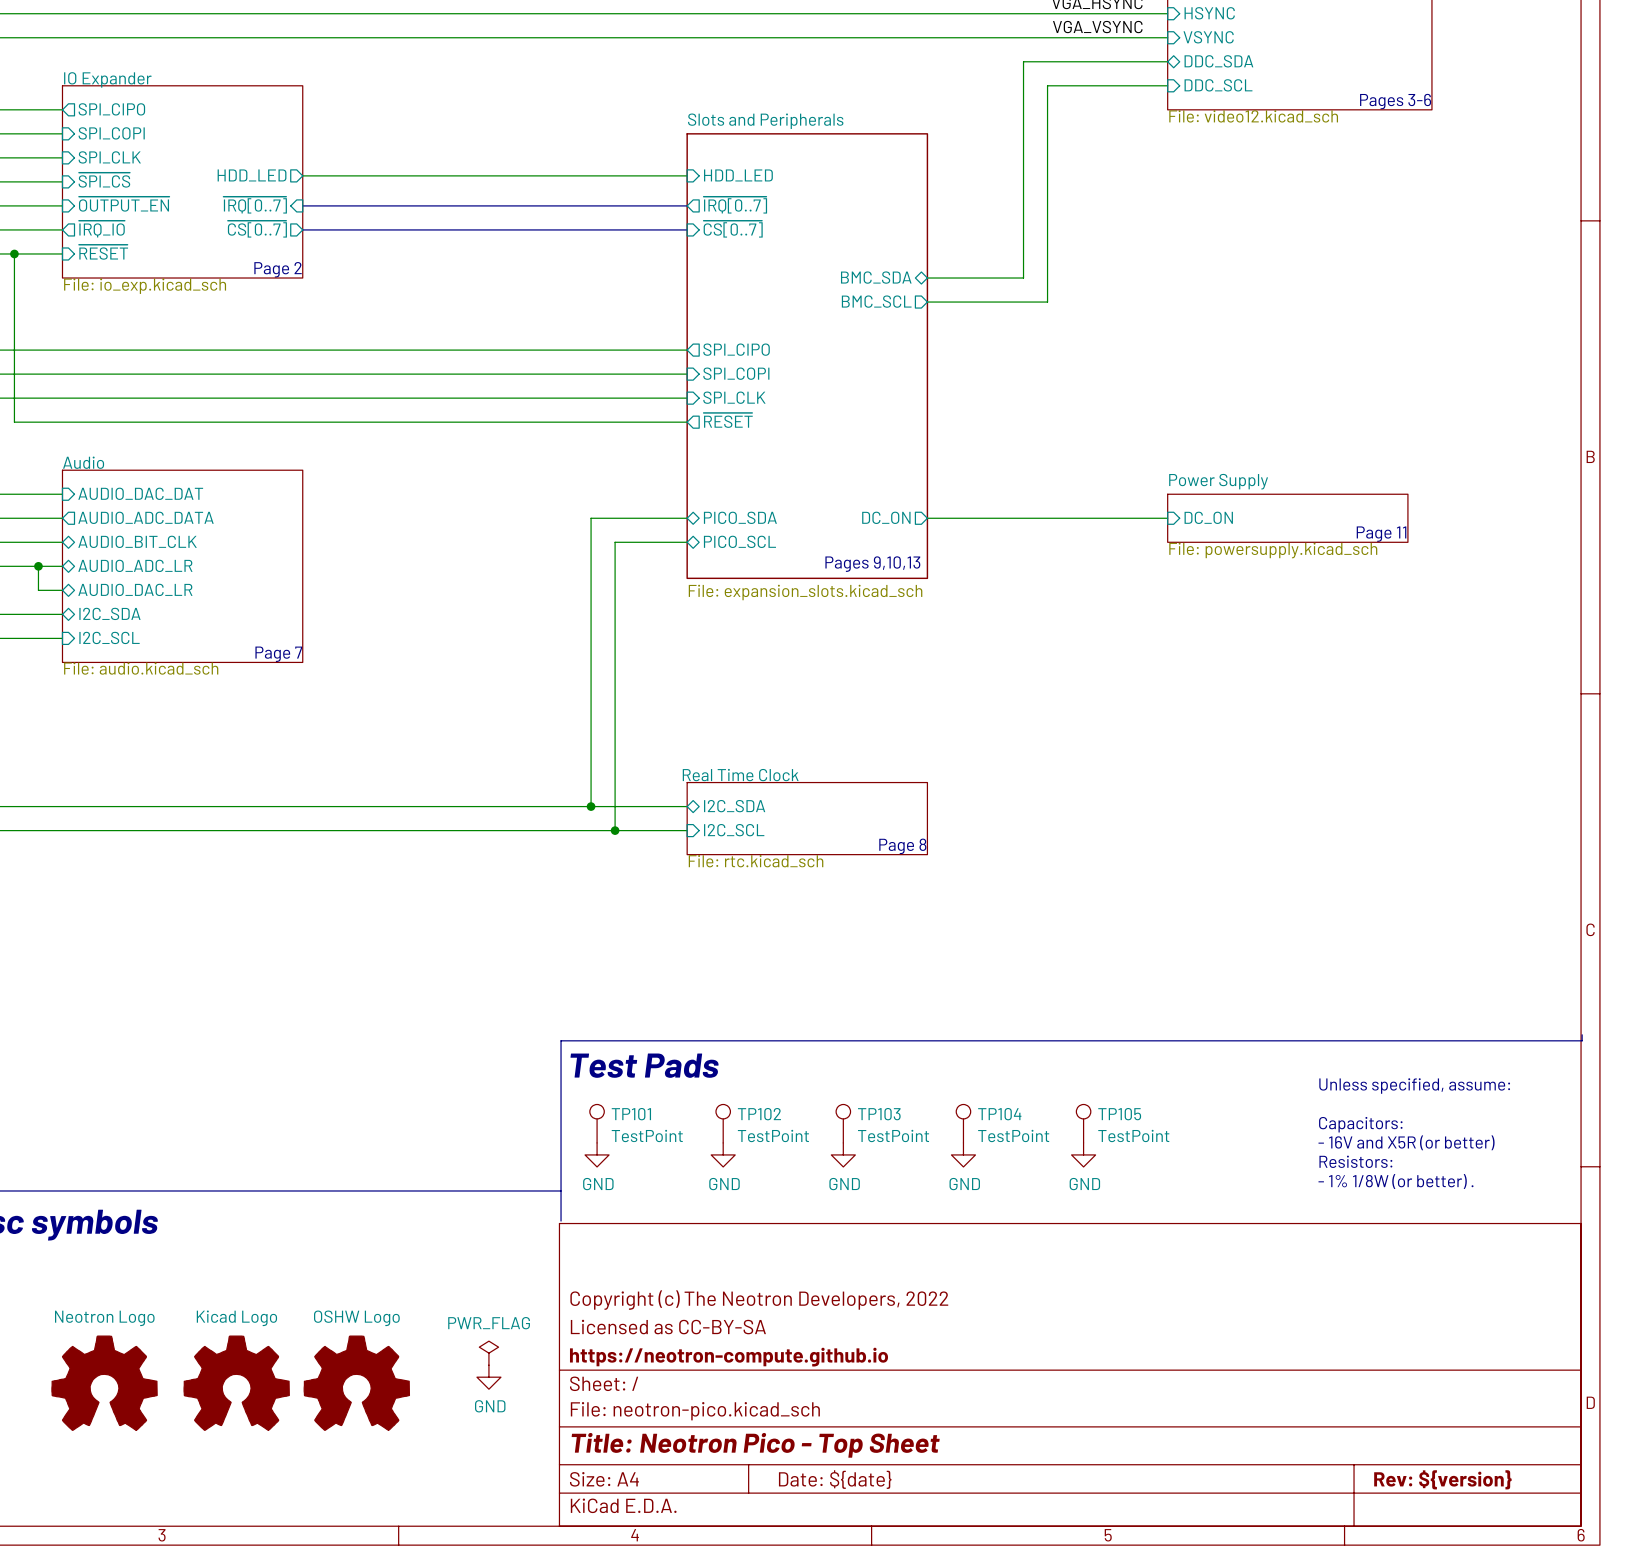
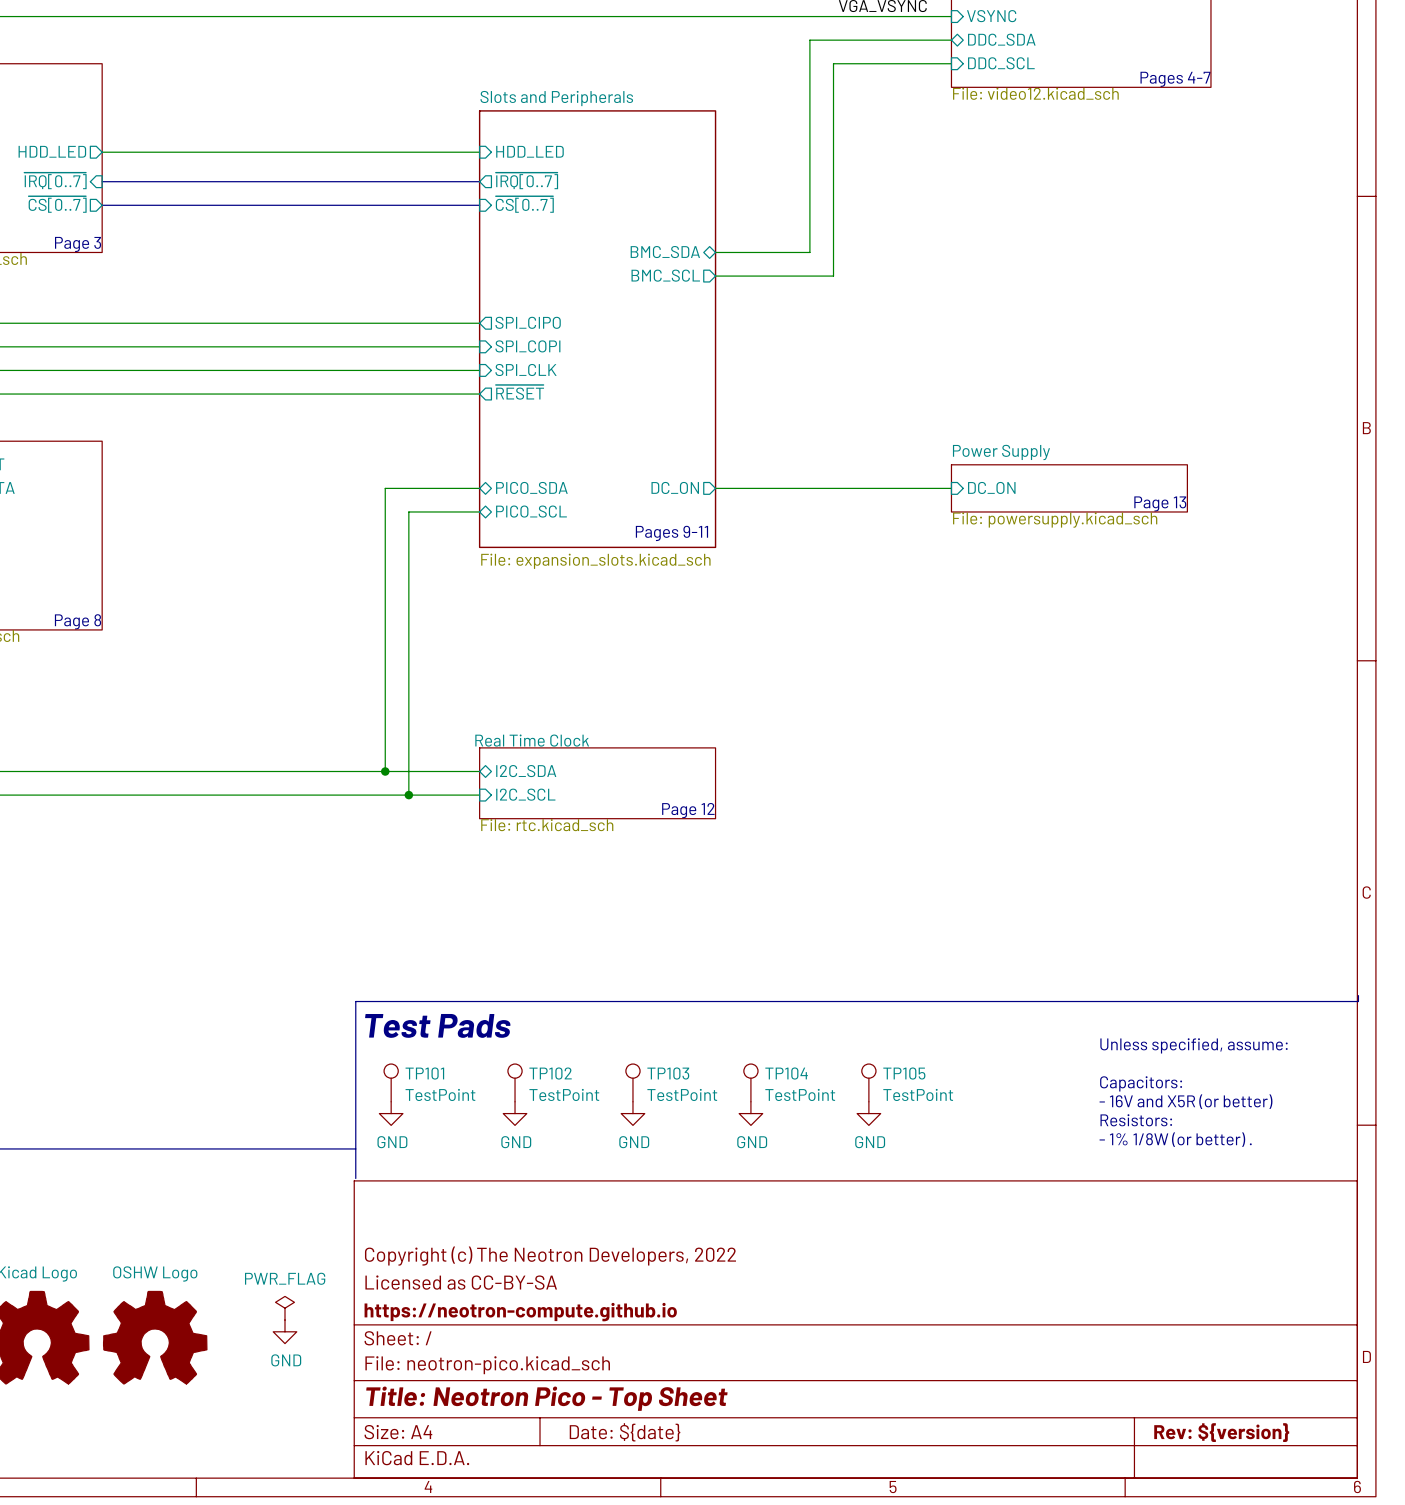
text: Pages 3-6 (1395, 101) -> Pages 4-7 (1175, 79)
text: Page 2 (278, 269) -> Page 3 (78, 244)
text: Page 11 (1381, 534) -> Page 13 (1160, 503)
text: Pages 9,10,13 (872, 564) -> Pages 9-11 (671, 533)
text: Page 7 (278, 654) -> Page 8 (78, 621)
text: Page 8 (902, 846) -> Page 12 (688, 810)

